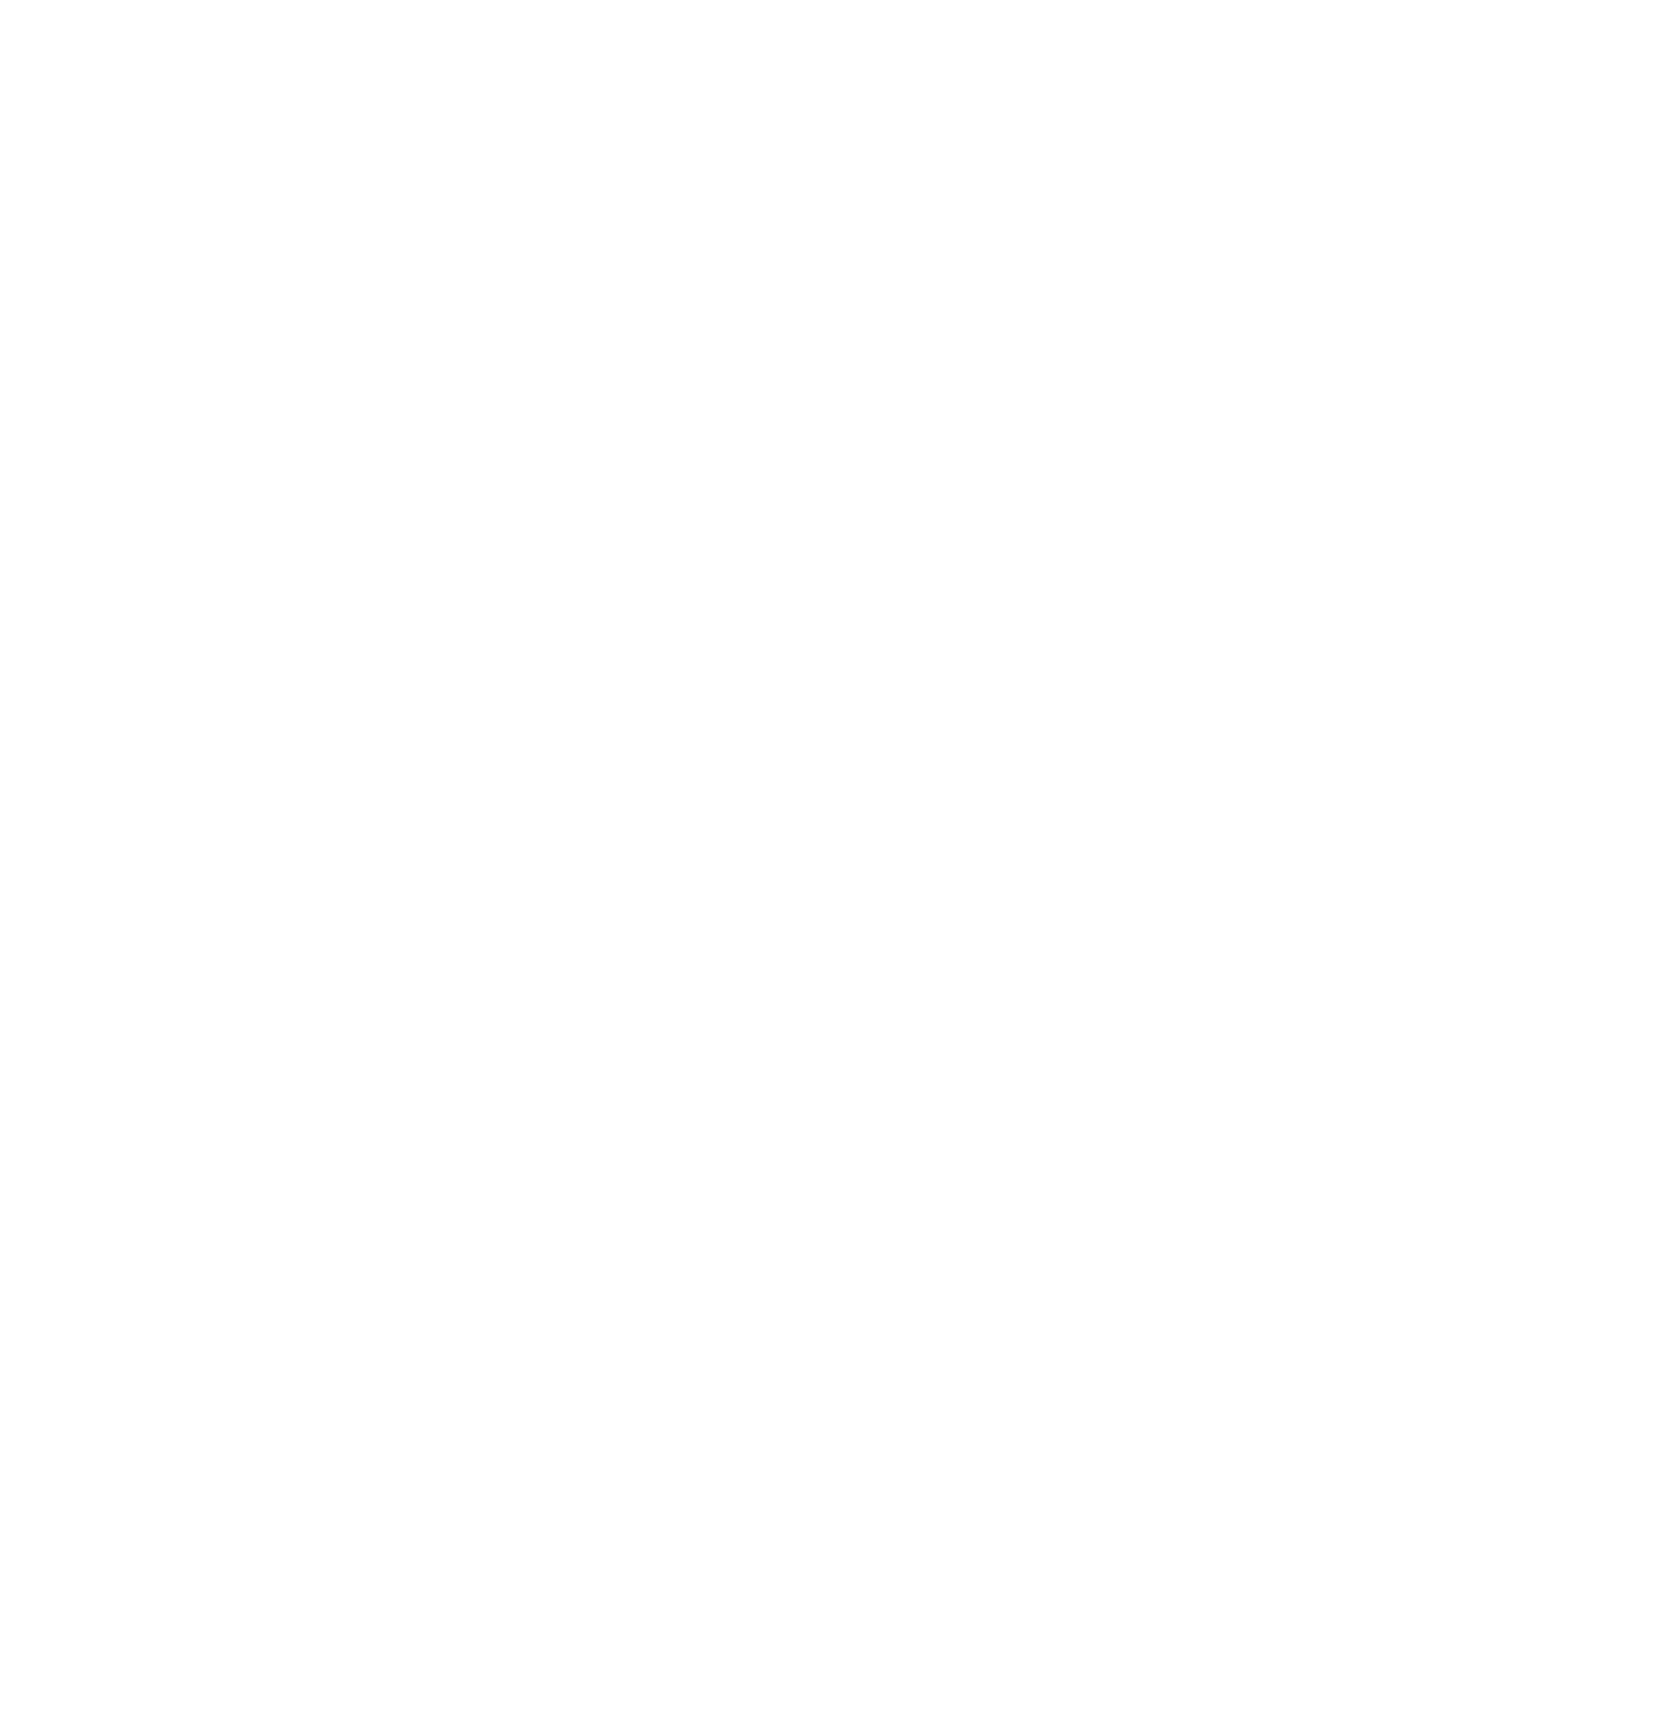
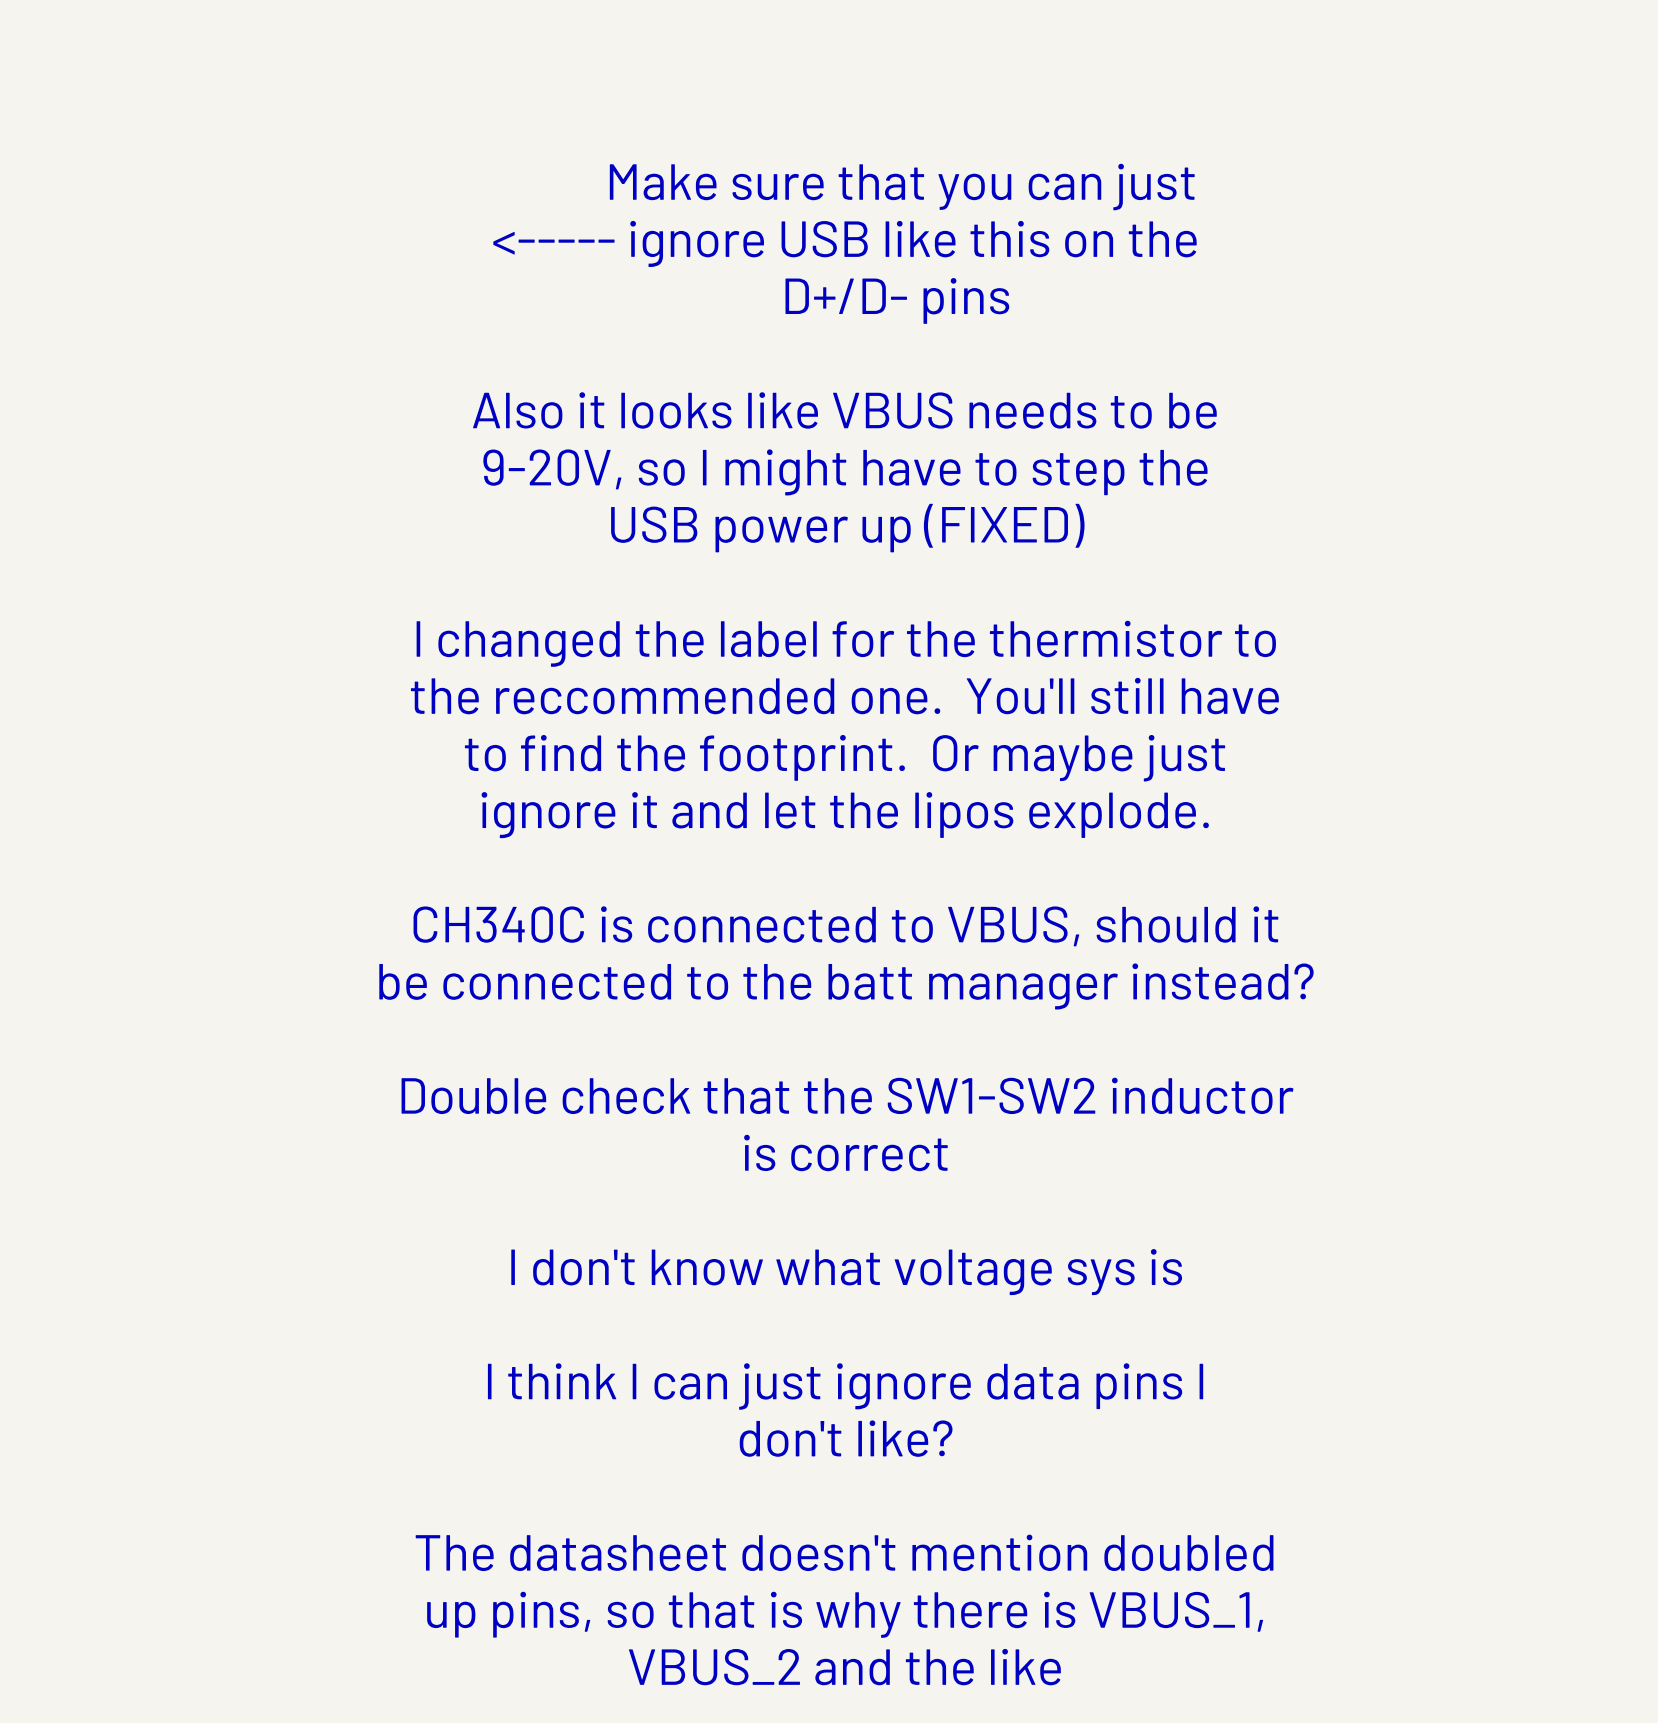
text: none -> Make sure that you can just (902, 187)
text: none -> <----- ignore USB like this on the (844, 243)
text: none -> D+/D- pins (897, 300)
text: none -> Also it looks like VBUS needs to be (844, 410)
text: none -> 9-20V, so I might have to step the (845, 472)
text: none -> USB power up (FIXED) (847, 528)
text: none -> I changed the label for the thermistor to (846, 643)
text: none -> the reccommended one. You'll still have (844, 696)
text: none -> to find the footprint. Or maybe just (845, 758)
text: none -> ignore it and let the lipos explode. (845, 815)
text: none -> CH340C is connected to VBUS, should it (845, 926)
text: none -> be connected to the batt manager instead? (846, 986)
text: none -> Double check that the SW1-SW2 inductor (847, 1095)
text: none -> is correct (845, 1153)
text: none -> I don't know what voltage sys is (846, 1272)
text: none -> I think I can just ignore data pins I (845, 1386)
text: none -> don't like? (846, 1438)
text: none -> The datasheet doesn't mention doubled (844, 1552)
text: none -> up pins, so that is why there is VBUS_1, (845, 1614)
text: none -> VBUS_2 and the like (844, 1667)

